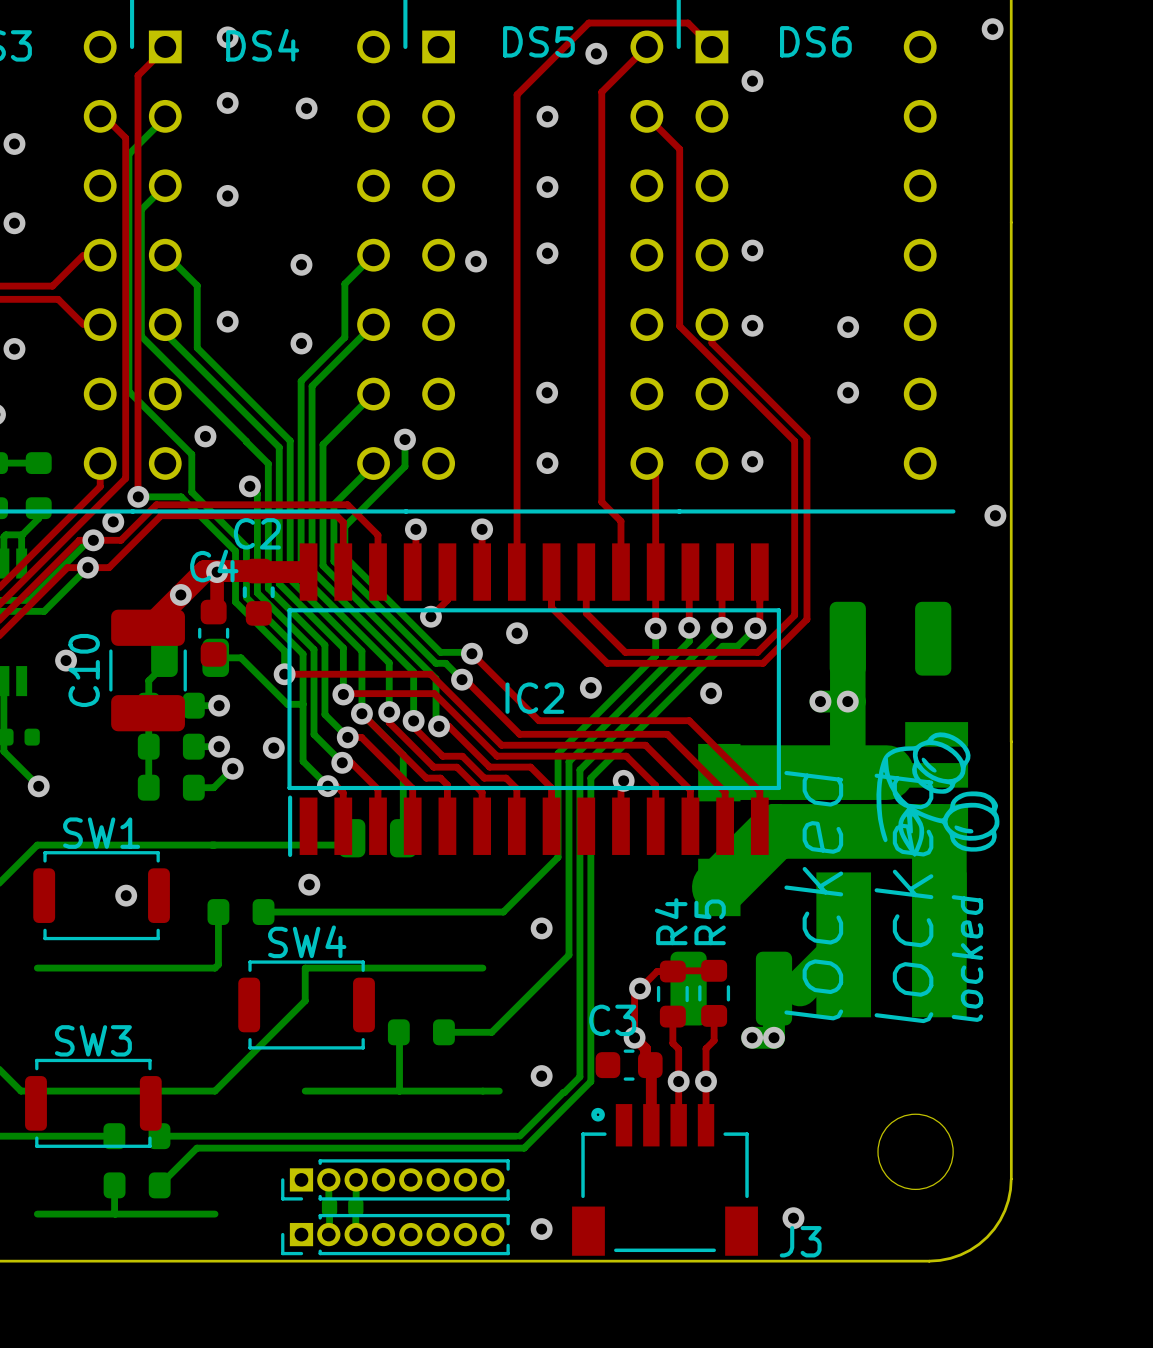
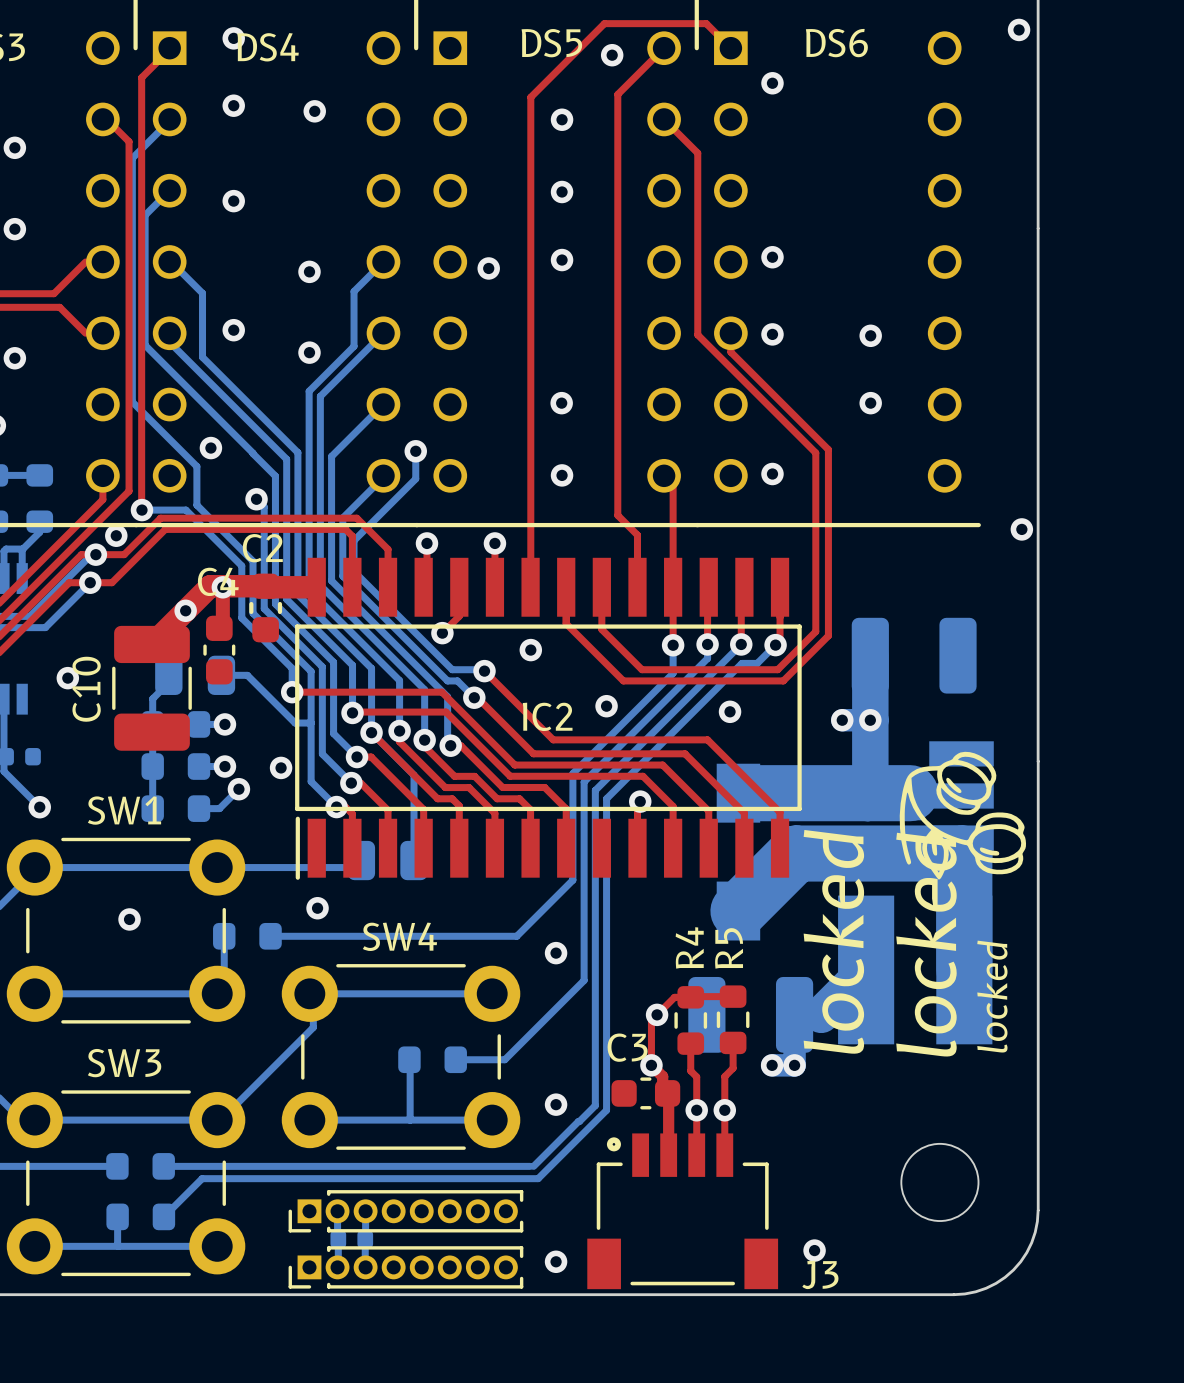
SW1 name position: SW1 (101, 833) -> SW1 (124, 810)
SW1 footprint: [33, 851, 170, 941] -> [6, 837, 246, 1024]
SW4 name position: SW4 (307, 941) -> SW4 (399, 936)
SW4 footprint: [238, 960, 375, 1050] -> [281, 964, 521, 1150]
SW3 footprint: [25, 1058, 162, 1148] -> [6, 1090, 246, 1277]

